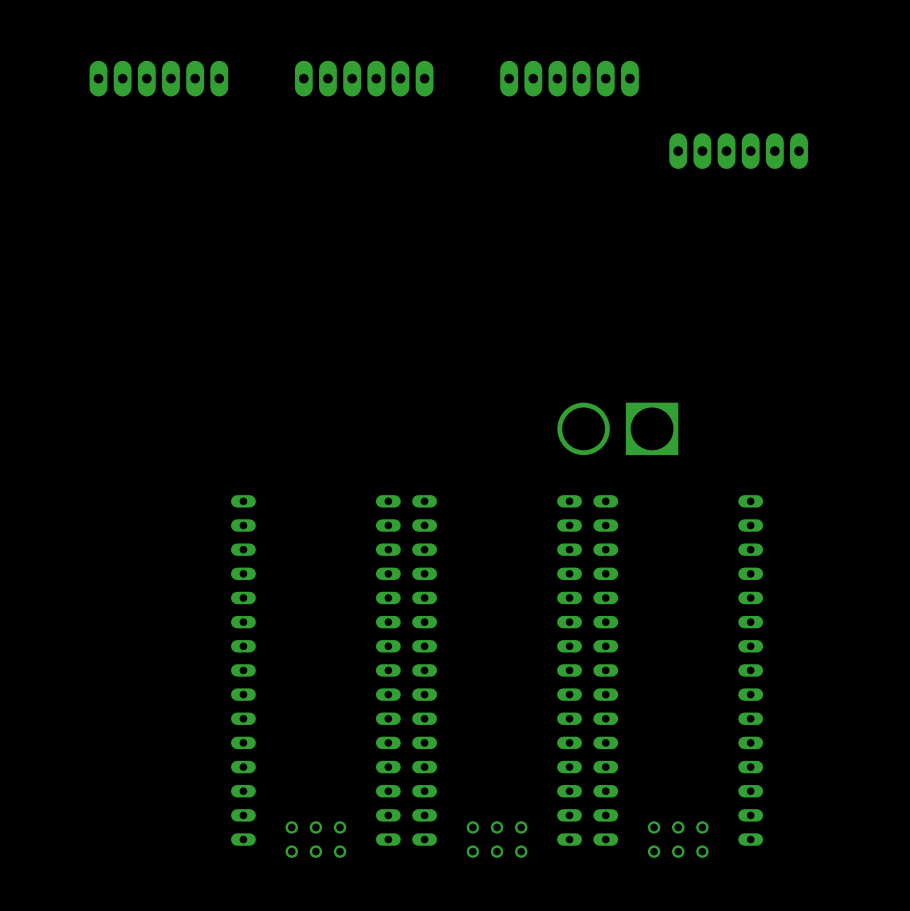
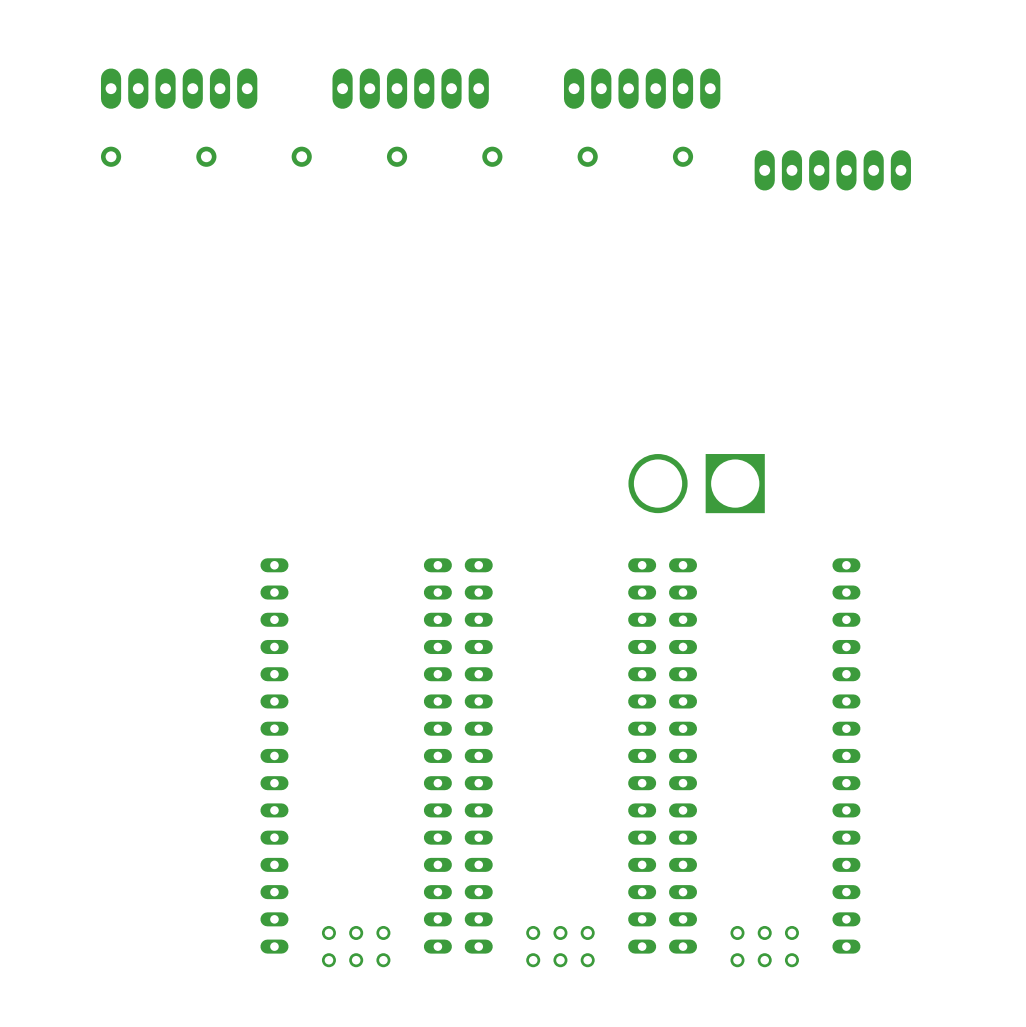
part: none -> (111, 156)
part: none -> (206, 156)
part: none -> (301, 156)
part: none -> (397, 156)
part: none -> (492, 156)
part: none -> (587, 156)
part: none -> (683, 156)

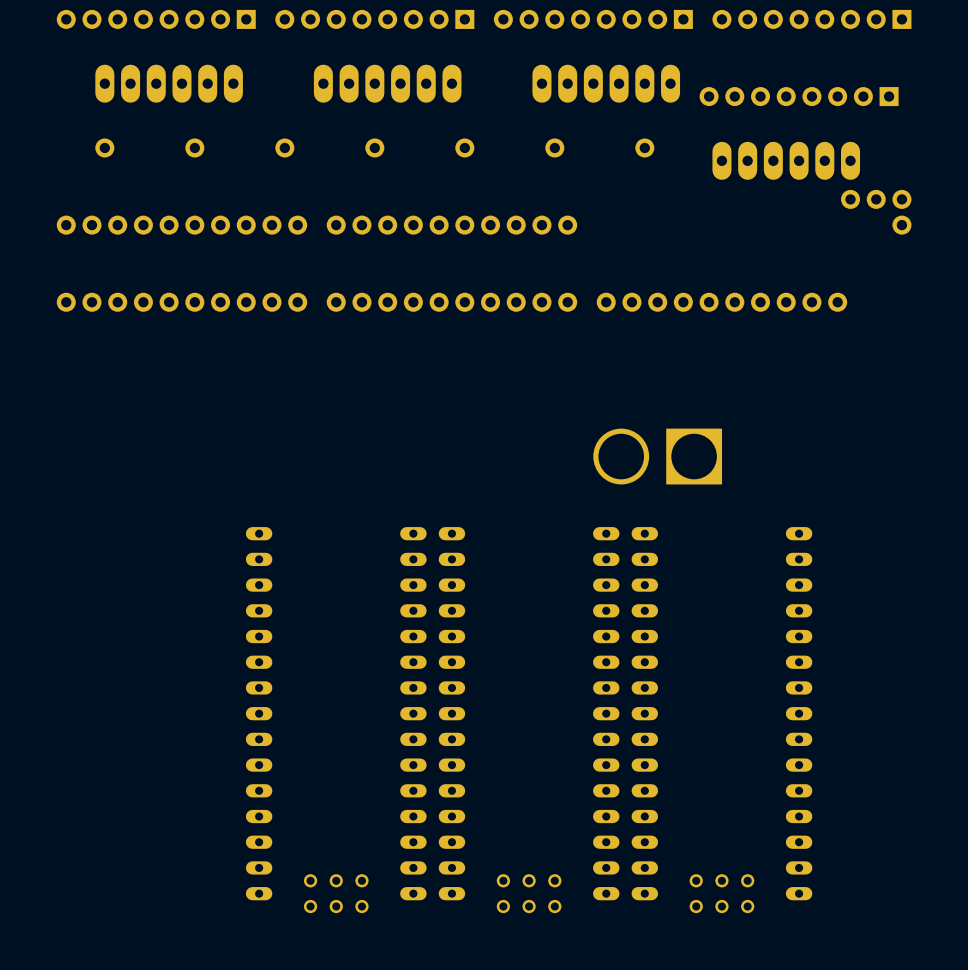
part: none -> (156, 19)
part: none -> (374, 19)
part: none -> (593, 19)
part: none -> (811, 19)
part: none -> (799, 96)
part: none -> (876, 199)
part: none -> (181, 225)
part: none -> (451, 225)
part: none -> (901, 225)
part: none -> (181, 302)
part: none -> (451, 302)
part: none -> (721, 302)

